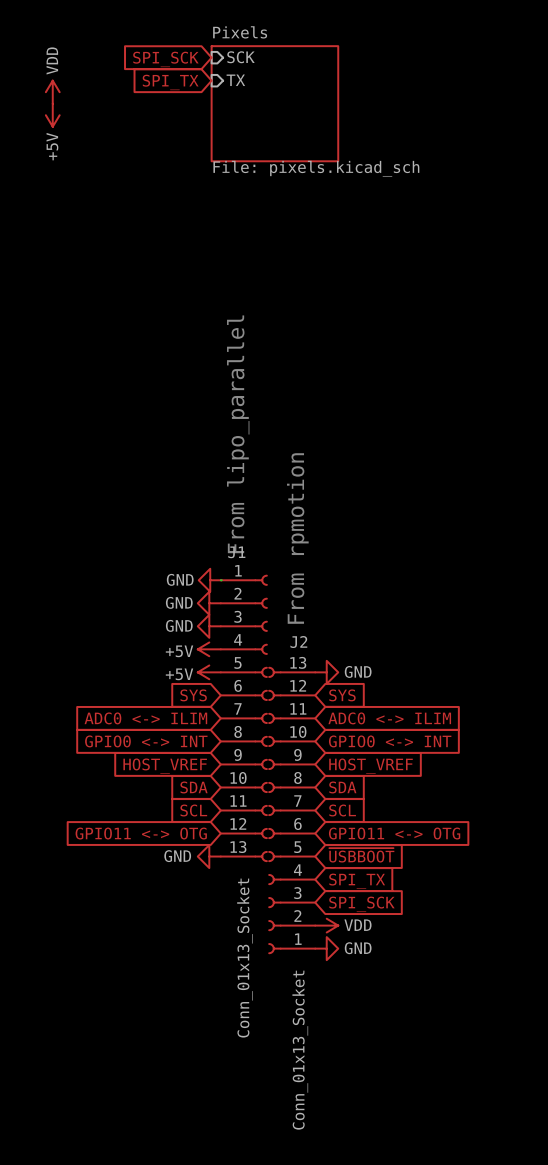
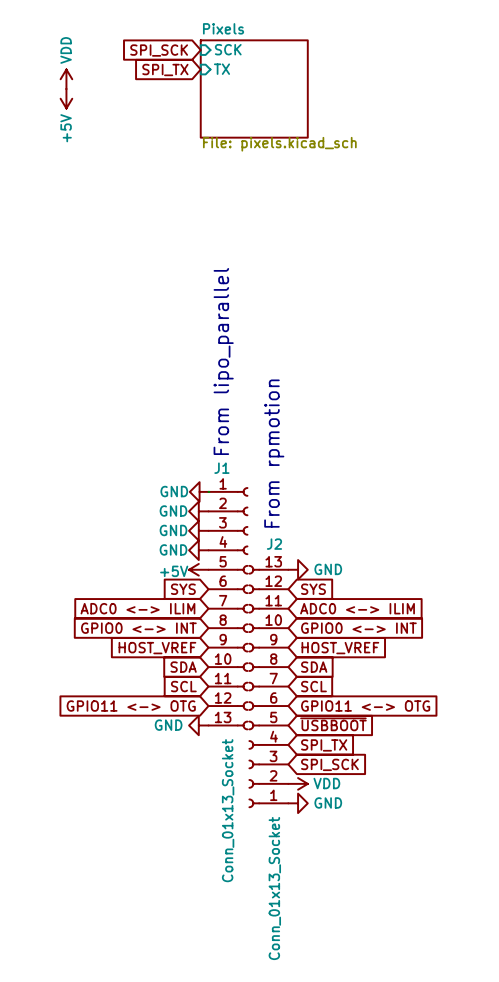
power symbol: +5V (209, 649) -> GND (198, 550)

